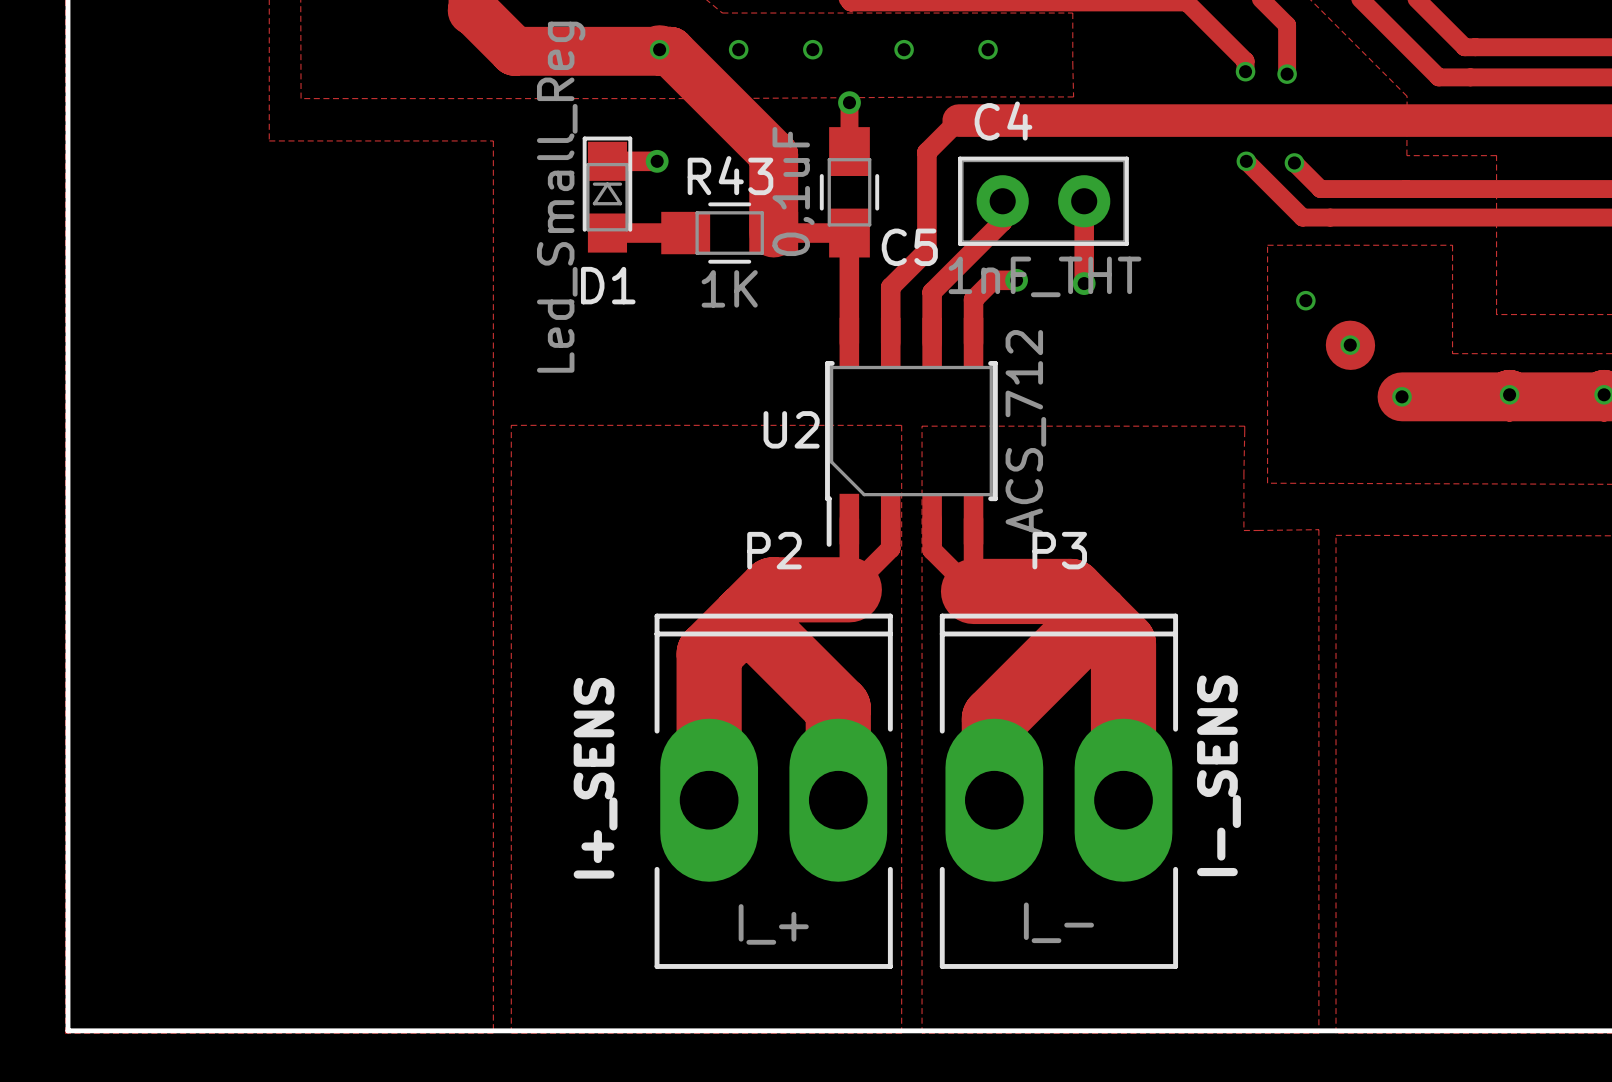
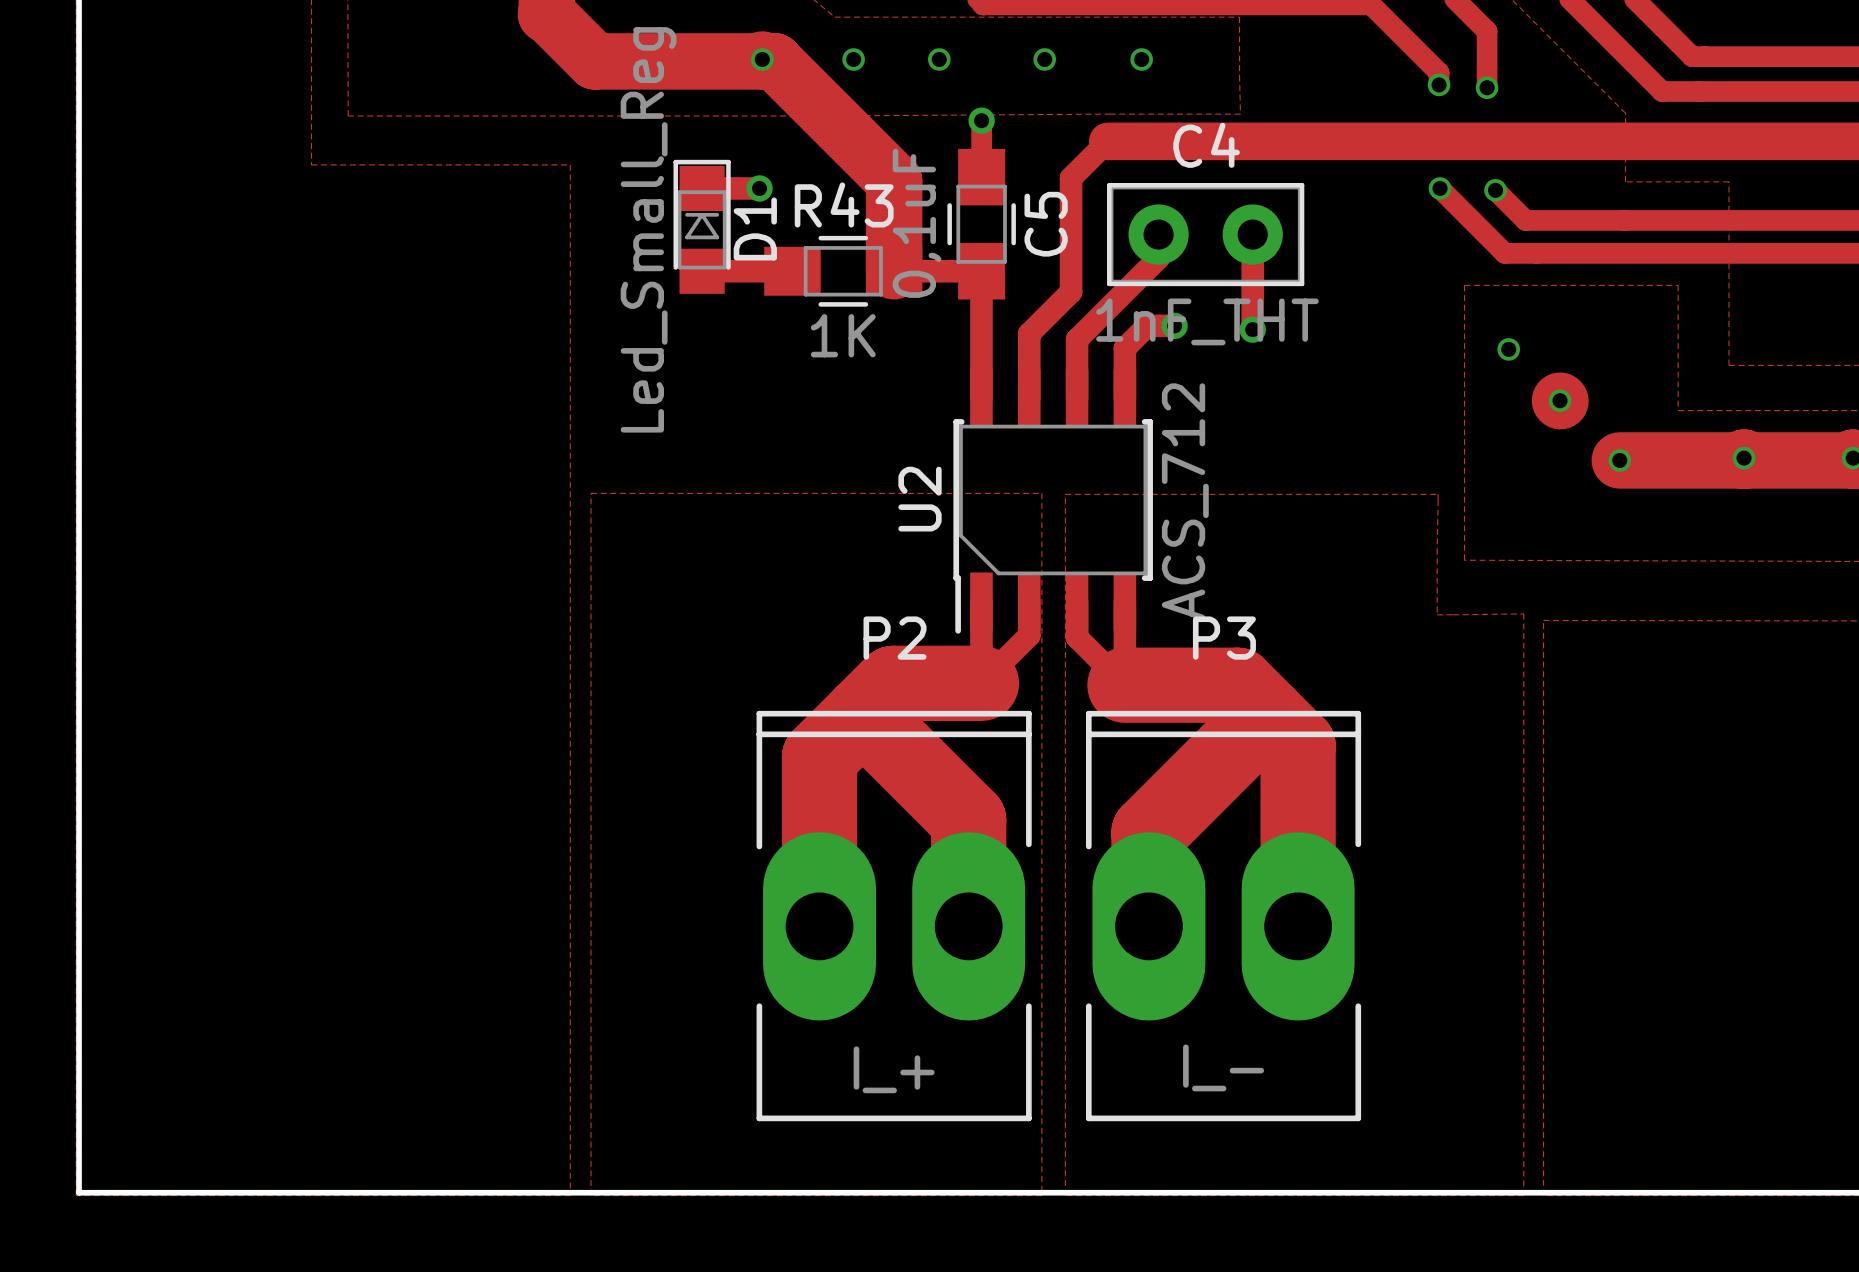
C4 name position: C4 (1003, 121) -> C4 (1206, 145)
C5 name rotation: 0° (909, 247) -> 90° counterclockwise (1046, 224)
D1 name rotation: 0° (608, 285) -> 90° counterclockwise (755, 228)
D1 name position: D1 (608, 285) -> D1 (755, 228)
U2 name rotation: 0° (791, 429) -> 90° counterclockwise (920, 499)
text: I-_SENS (1218, 775) -> none
text: I+_SENS (595, 778) -> none

